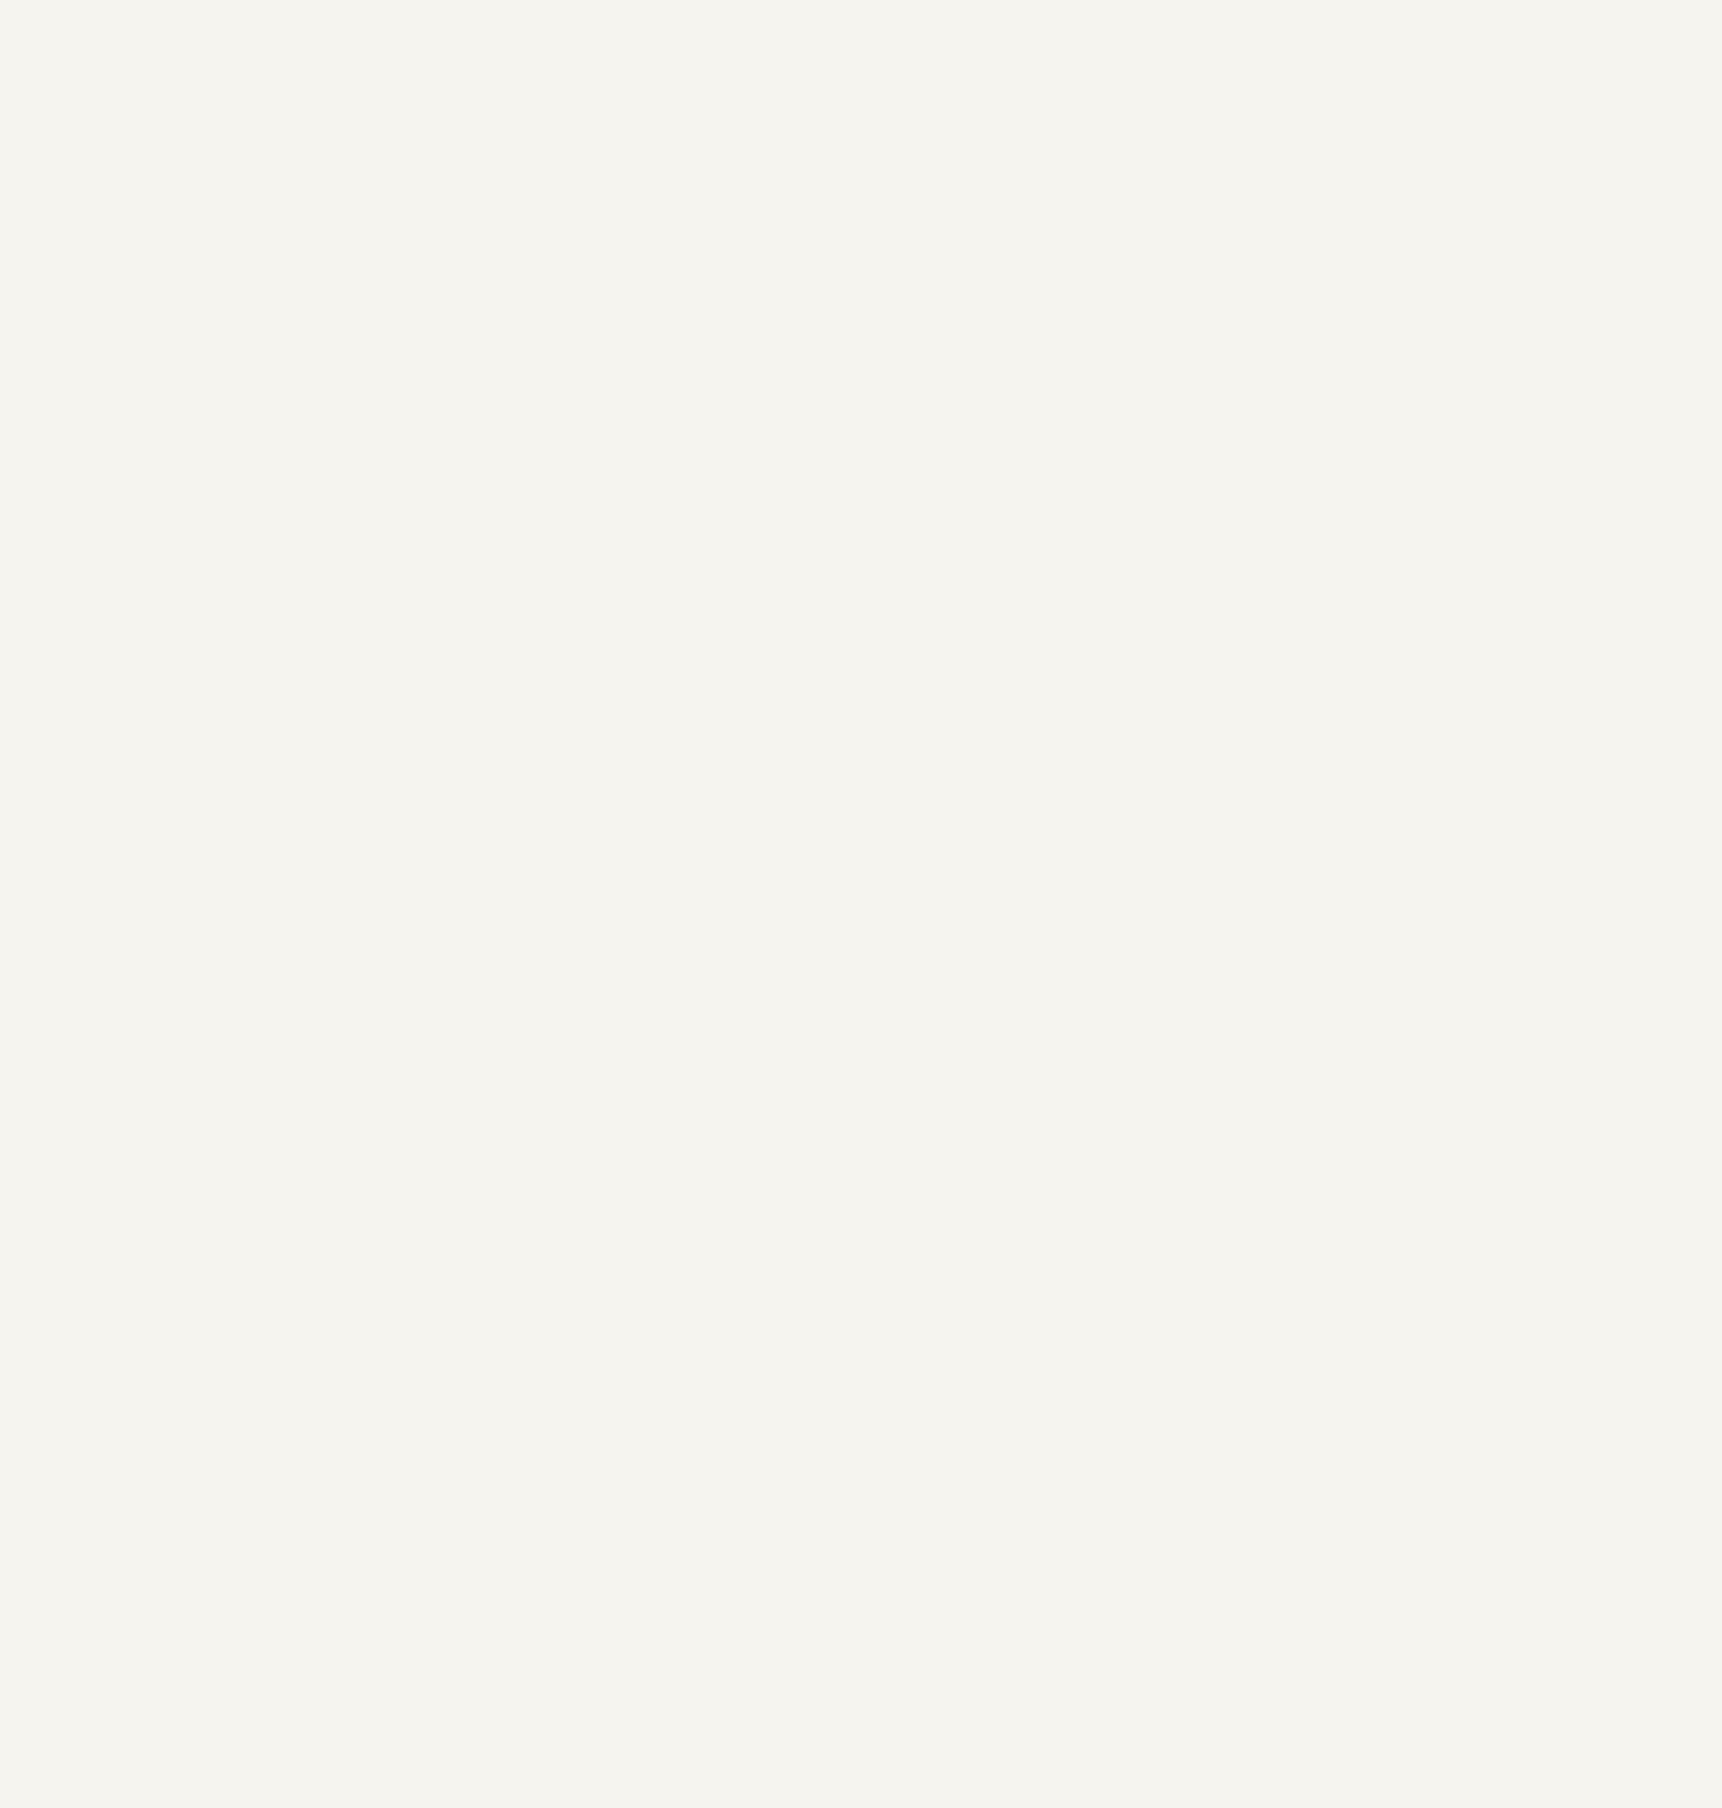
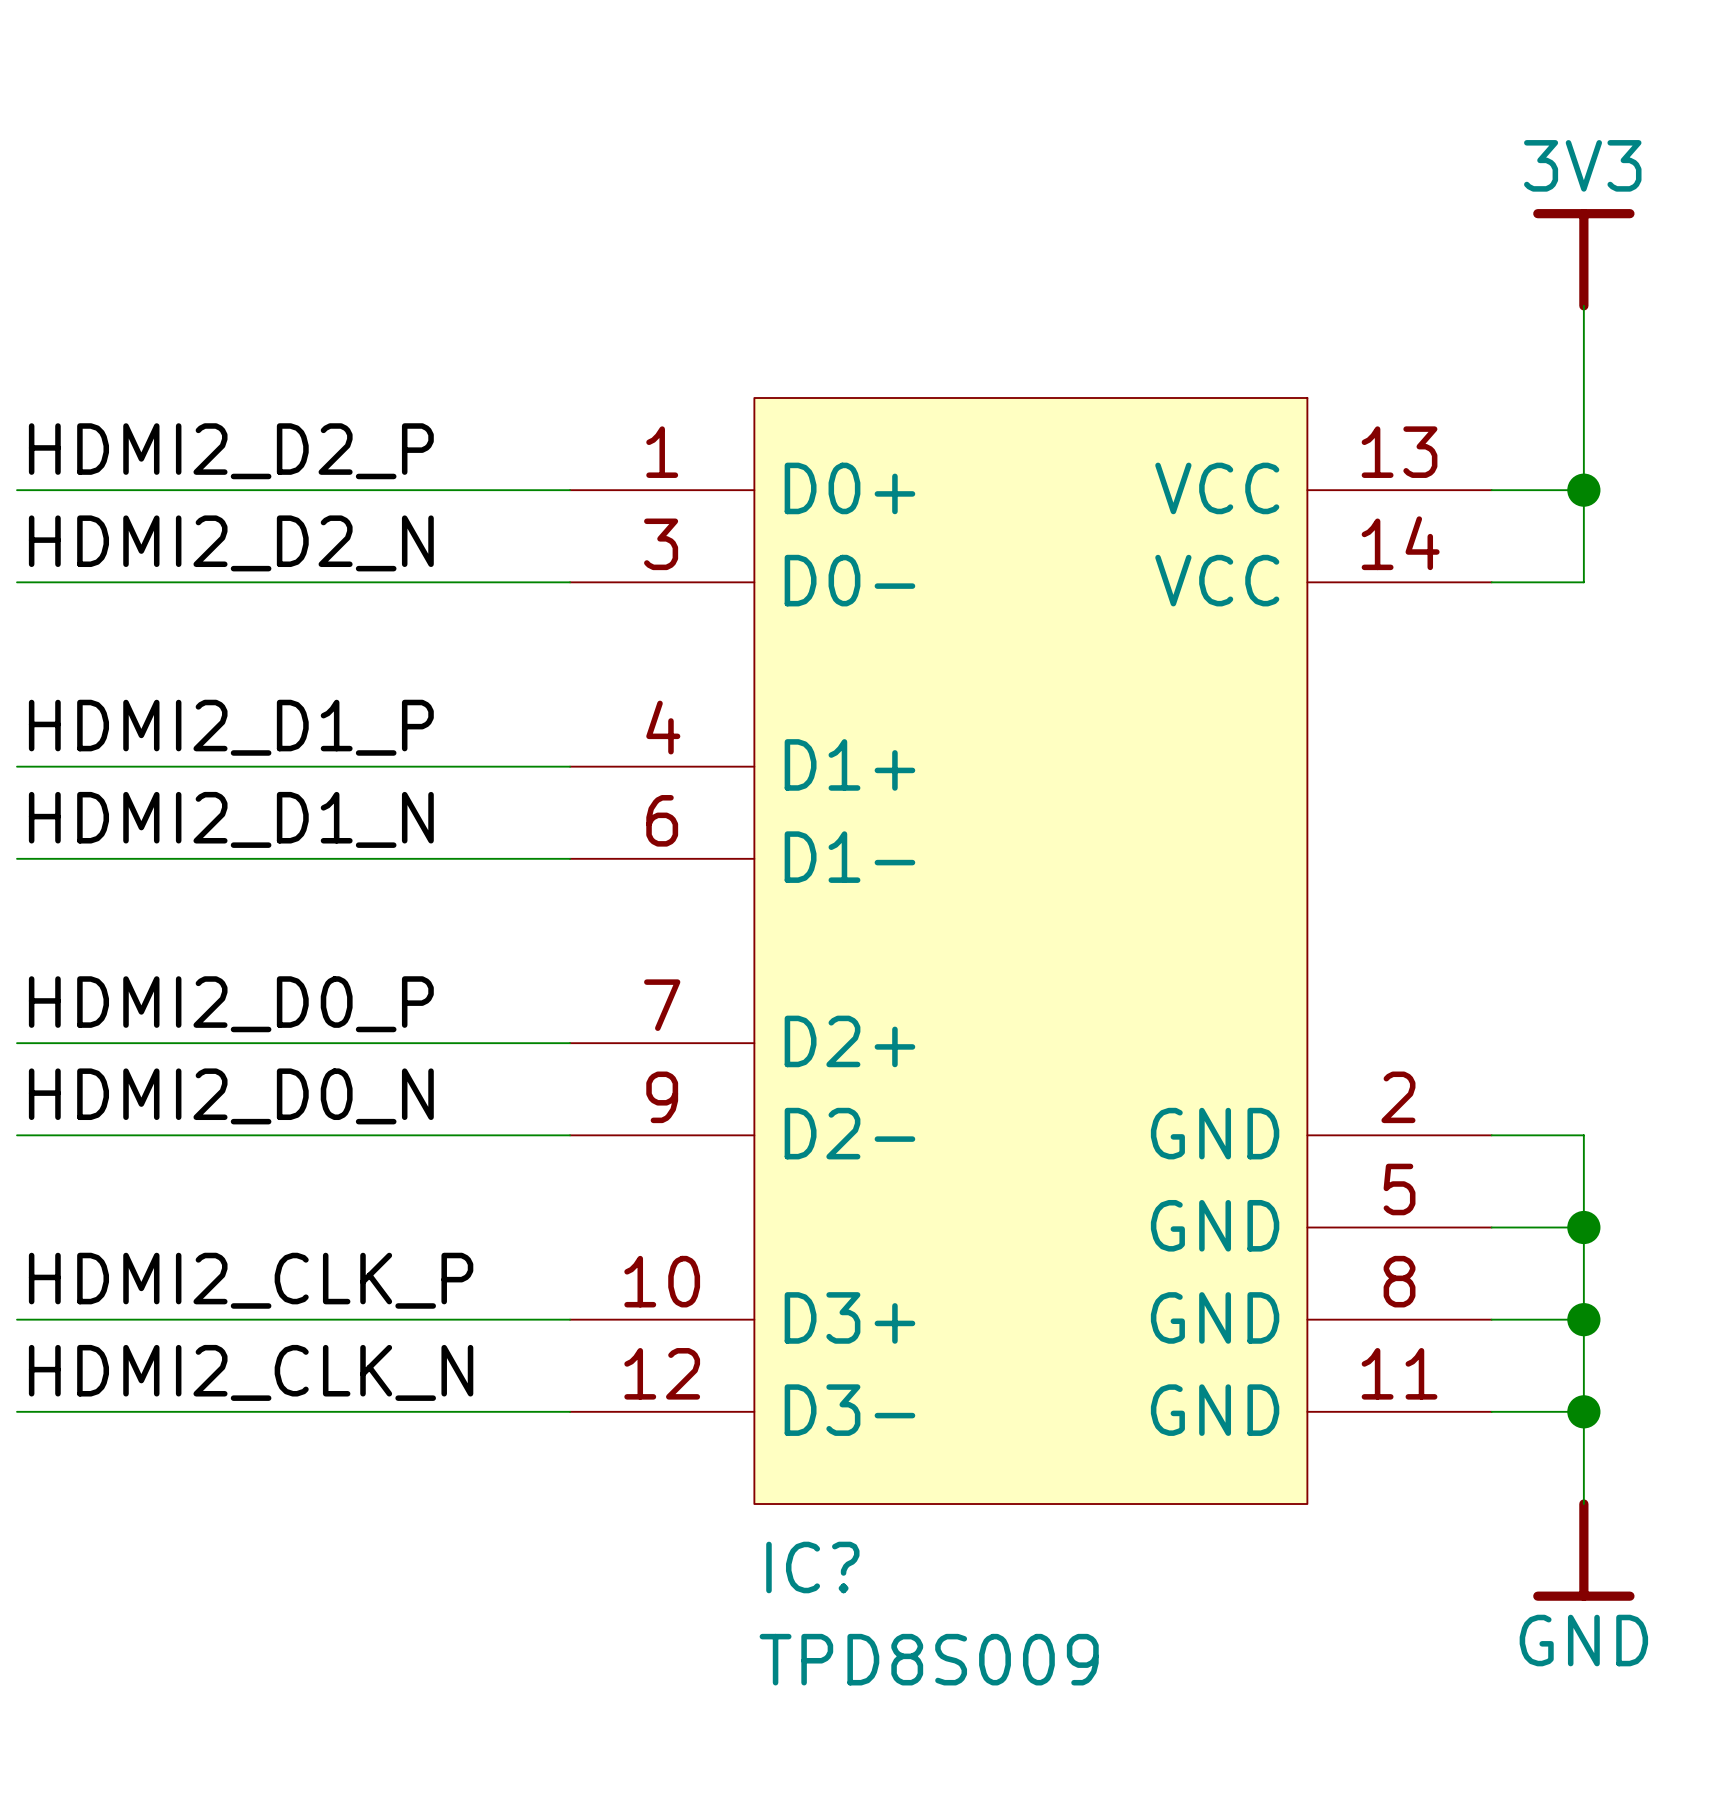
power symbol: none -> 3V3 (1583, 259)
wire: none -> (1583, 305) (1583, 582) (1491, 582)
label: none -> HDMI2_D2_P (231, 451)
wire: none -> (17, 490) (570, 490)
wire: none -> (1491, 490) (1583, 490)
junction: none -> (1583, 490)
label: none -> HDMI2_D2_N (231, 543)
wire: none -> (17, 582) (570, 582)
label: none -> HDMI2_D1_P (231, 727)
wire: none -> (17, 766) (570, 766)
label: none -> HDMI2_D1_N (231, 819)
wire: none -> (17, 858) (570, 858)
IC?: none -> (1030, 951)
label: none -> HDMI2_D0_P (231, 1004)
wire: none -> (17, 1043) (570, 1043)
label: none -> HDMI2_D0_N (231, 1096)
wire: none -> (17, 1135) (570, 1135)
wire: none -> (1491, 1135) (1583, 1135) (1583, 1504)
wire: none -> (1491, 1227) (1583, 1227)
junction: none -> (1583, 1227)
label: none -> HDMI2_CLK_P (251, 1280)
wire: none -> (17, 1319) (570, 1319)
wire: none -> (1491, 1319) (1583, 1319)
junction: none -> (1583, 1319)
label: none -> HDMI2_CLK_N (251, 1372)
wire: none -> (17, 1411) (570, 1411)
wire: none -> (1491, 1411) (1583, 1411)
junction: none -> (1583, 1411)
power symbol: none -> GND (1583, 1550)

